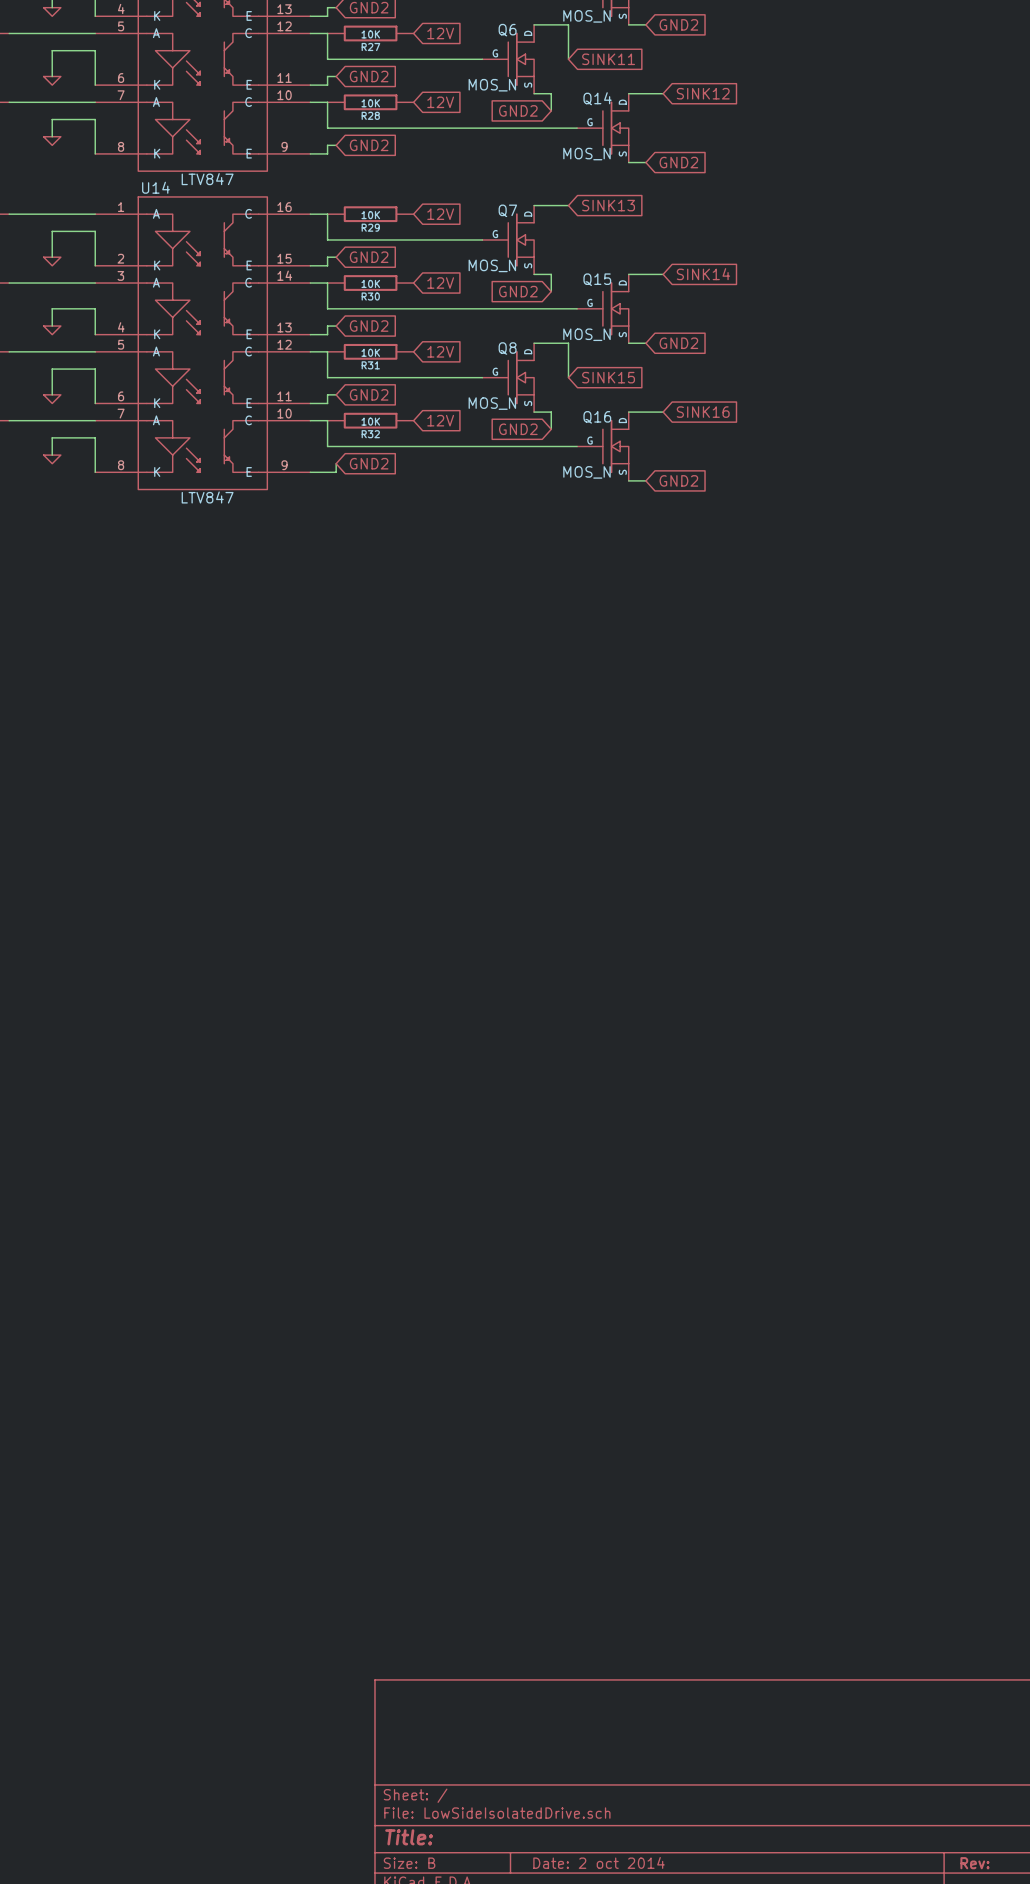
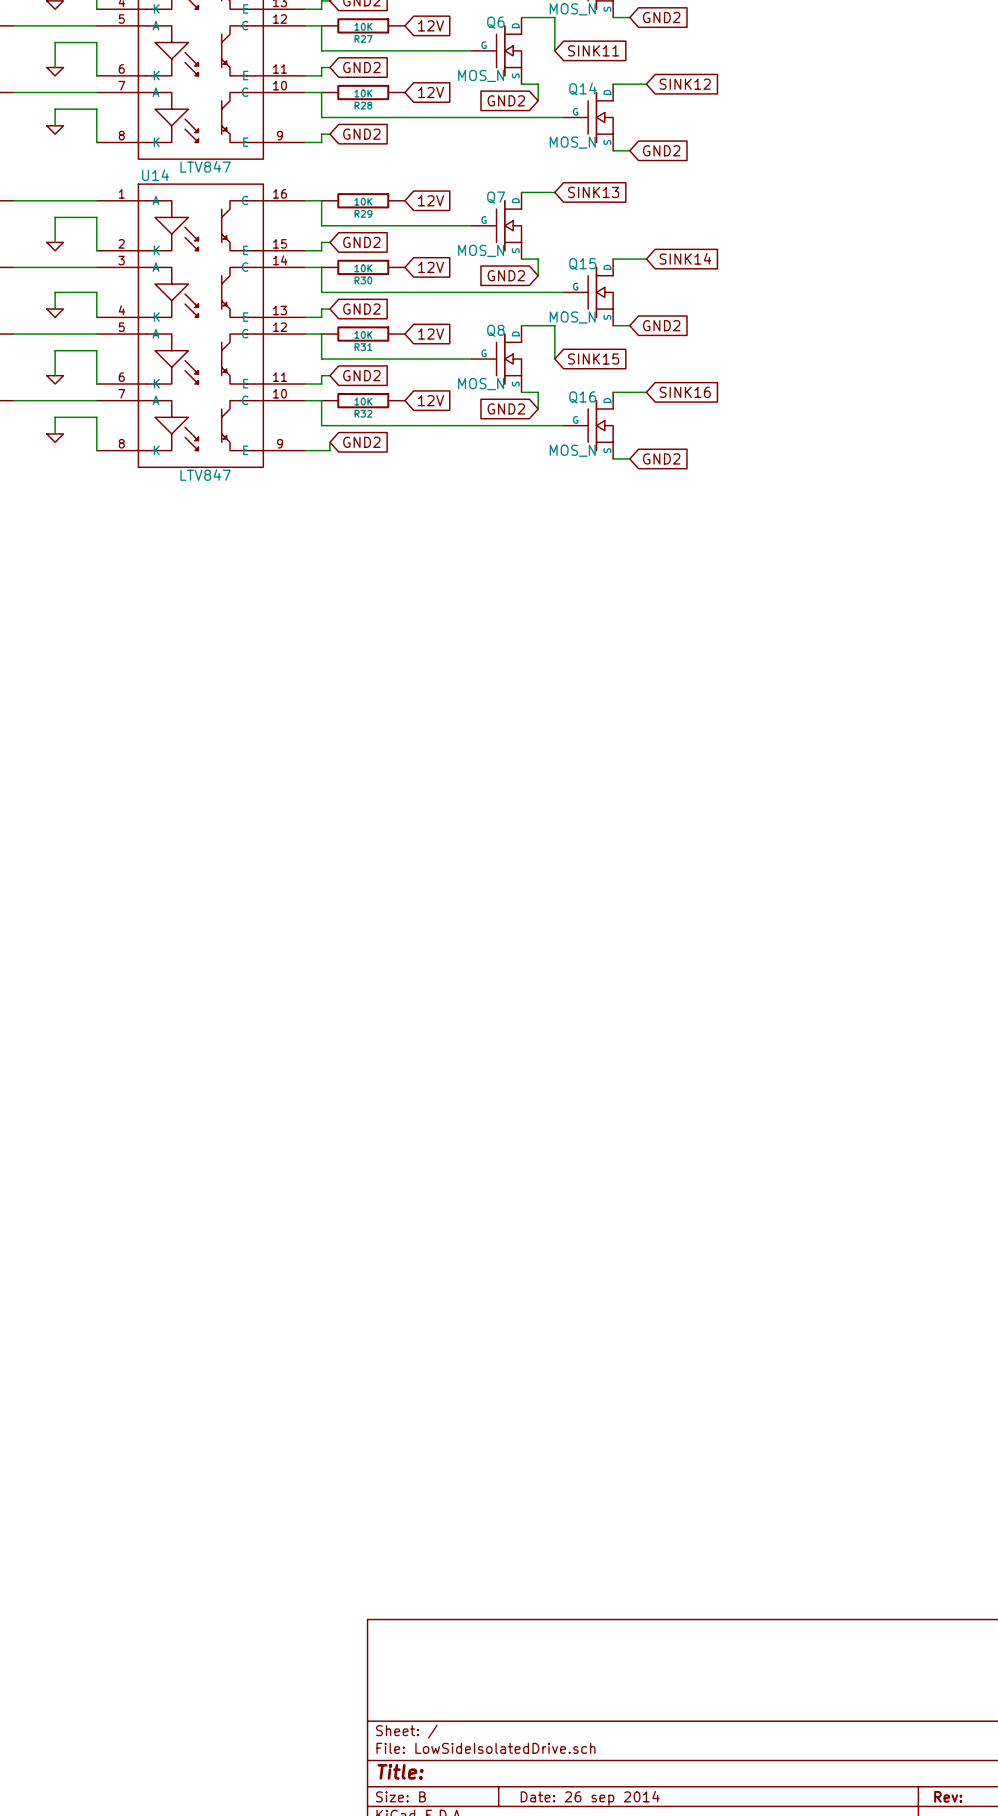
title block: Date: 2 oct 2014 (599, 1862) -> Date: 26 sep 2014 (590, 1798)

